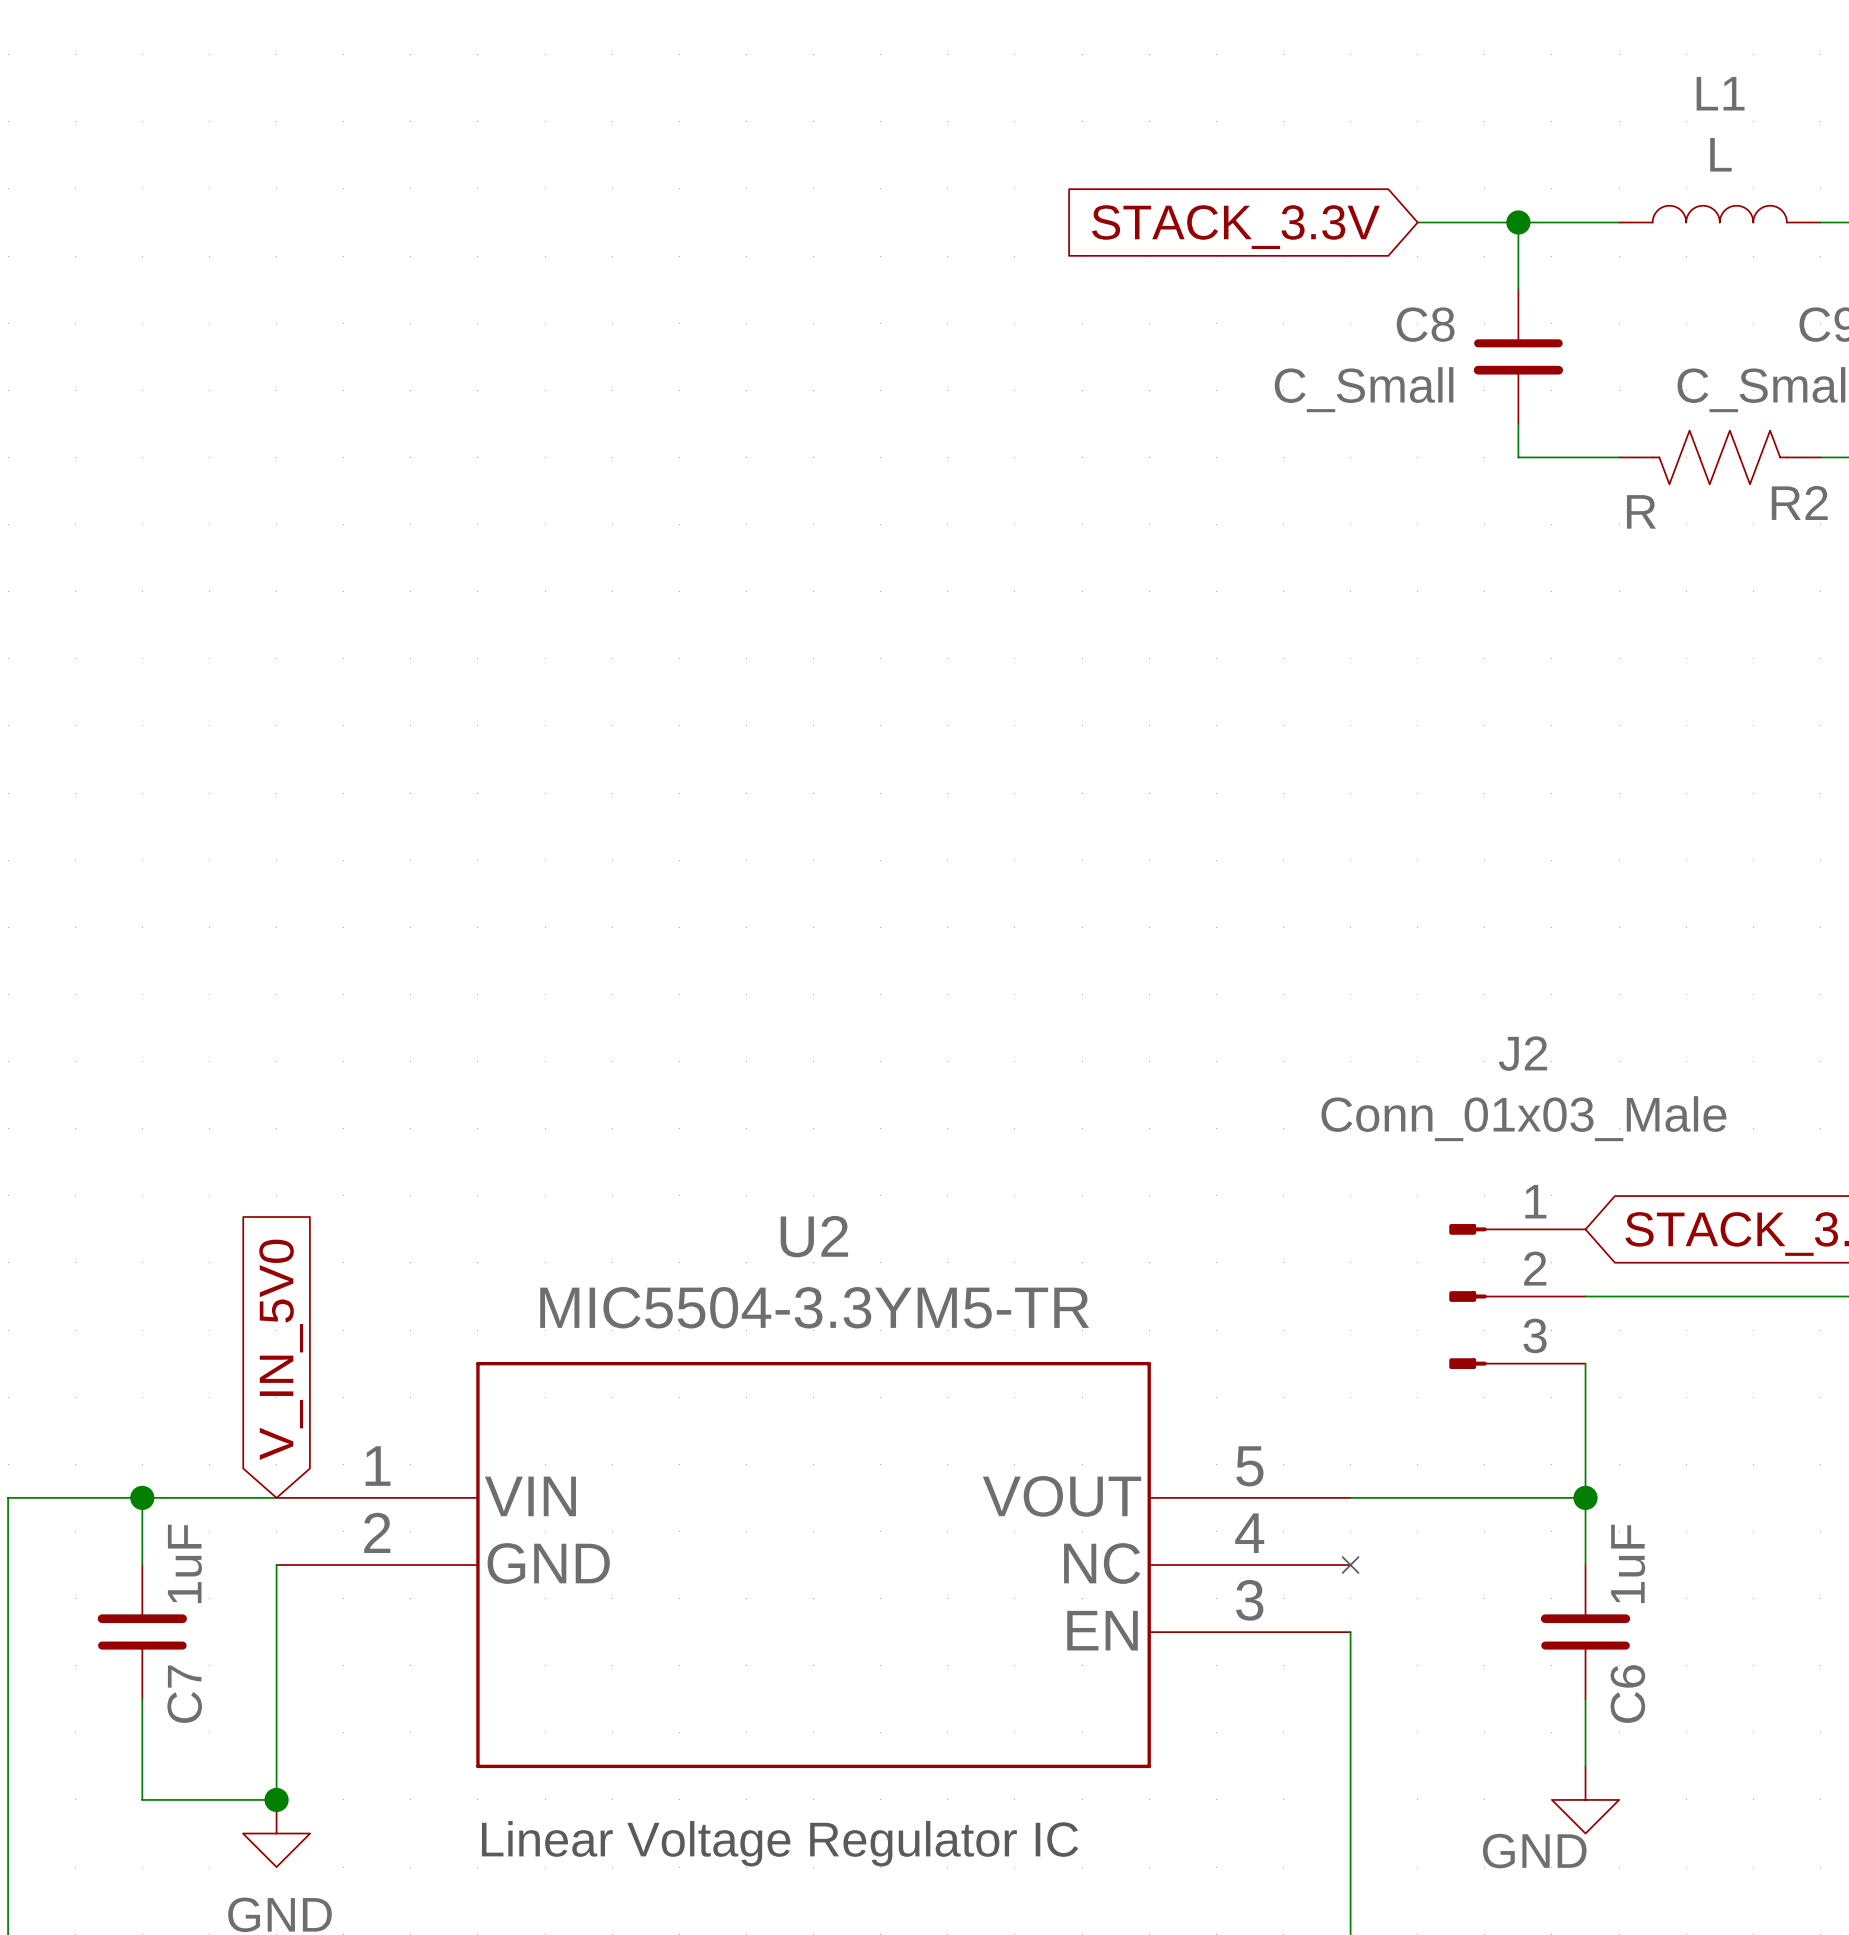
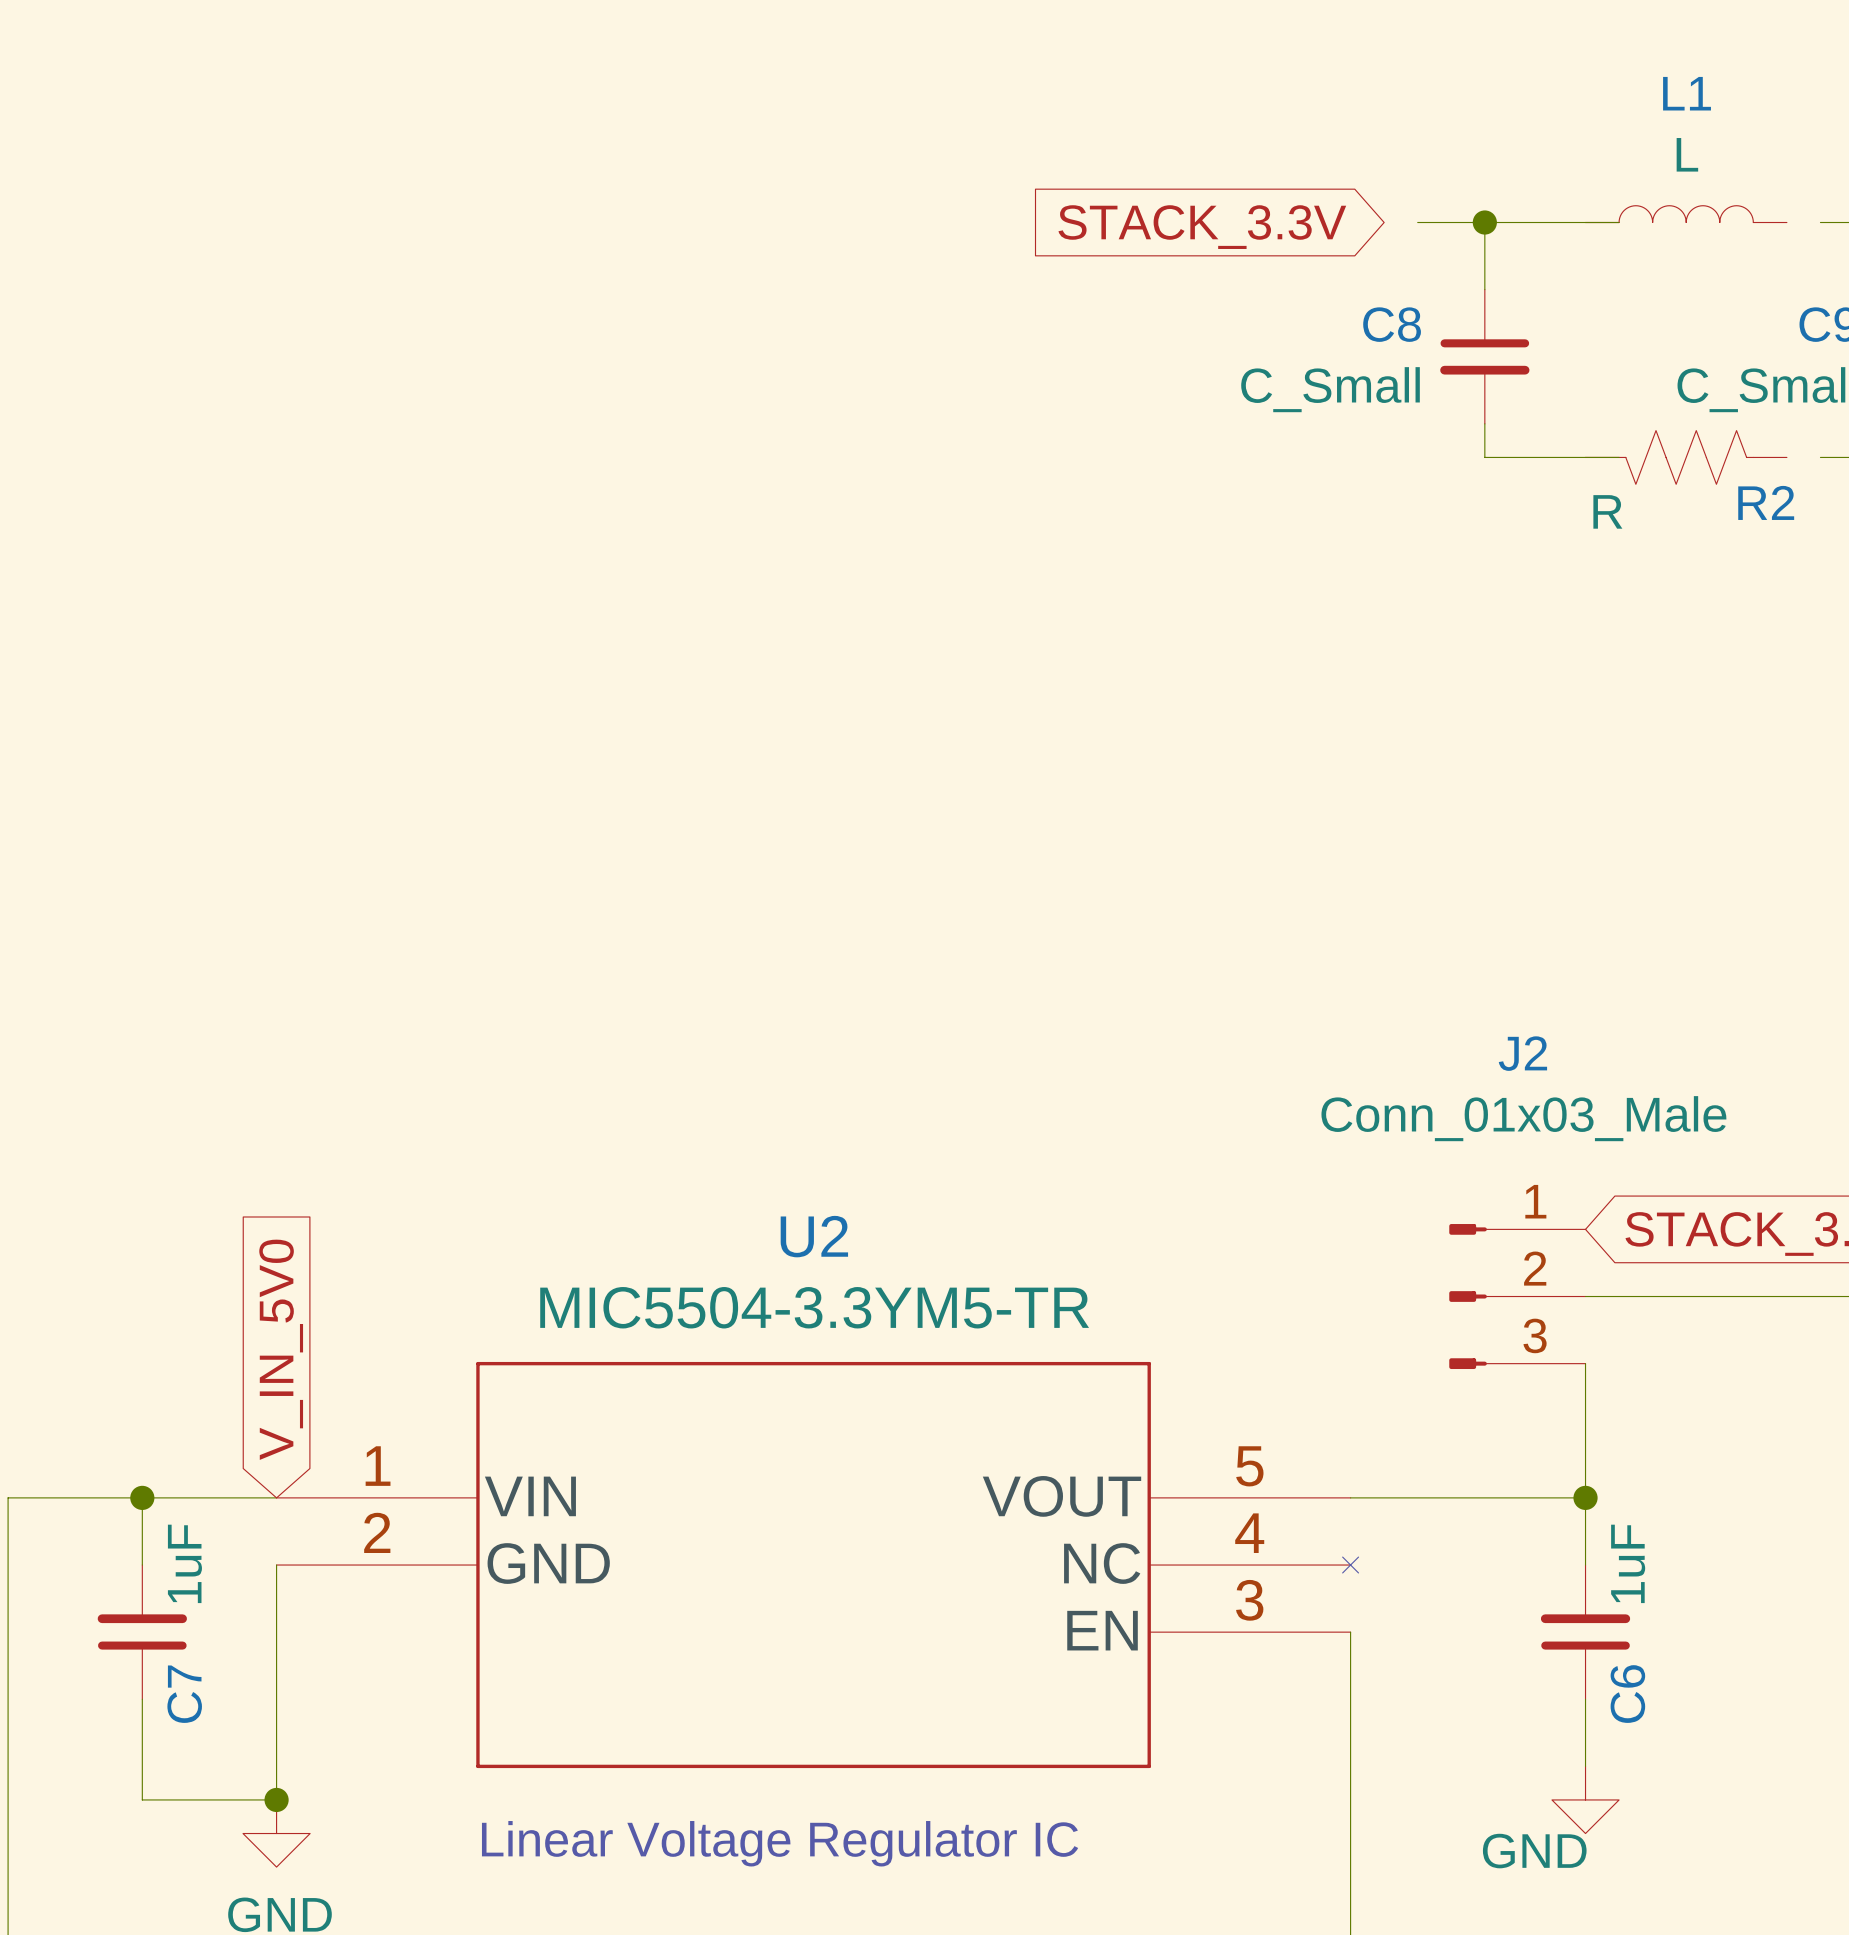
L1 position: (1719, 214) -> (1686, 214)
wire: (1518, 222) (1518, 289) -> (1484, 222) (1484, 289)
junction position: (1518, 222) -> (1484, 222)
global label position: STACK_3.3V (1235, 227) -> STACK_3.3V (1202, 227)
C8 position: (1518, 356) -> (1484, 356)
wire: (1518, 423) (1518, 457) -> (1484, 423) (1484, 457) (1518, 457)
R2 position: (1719, 457) -> (1686, 457)

